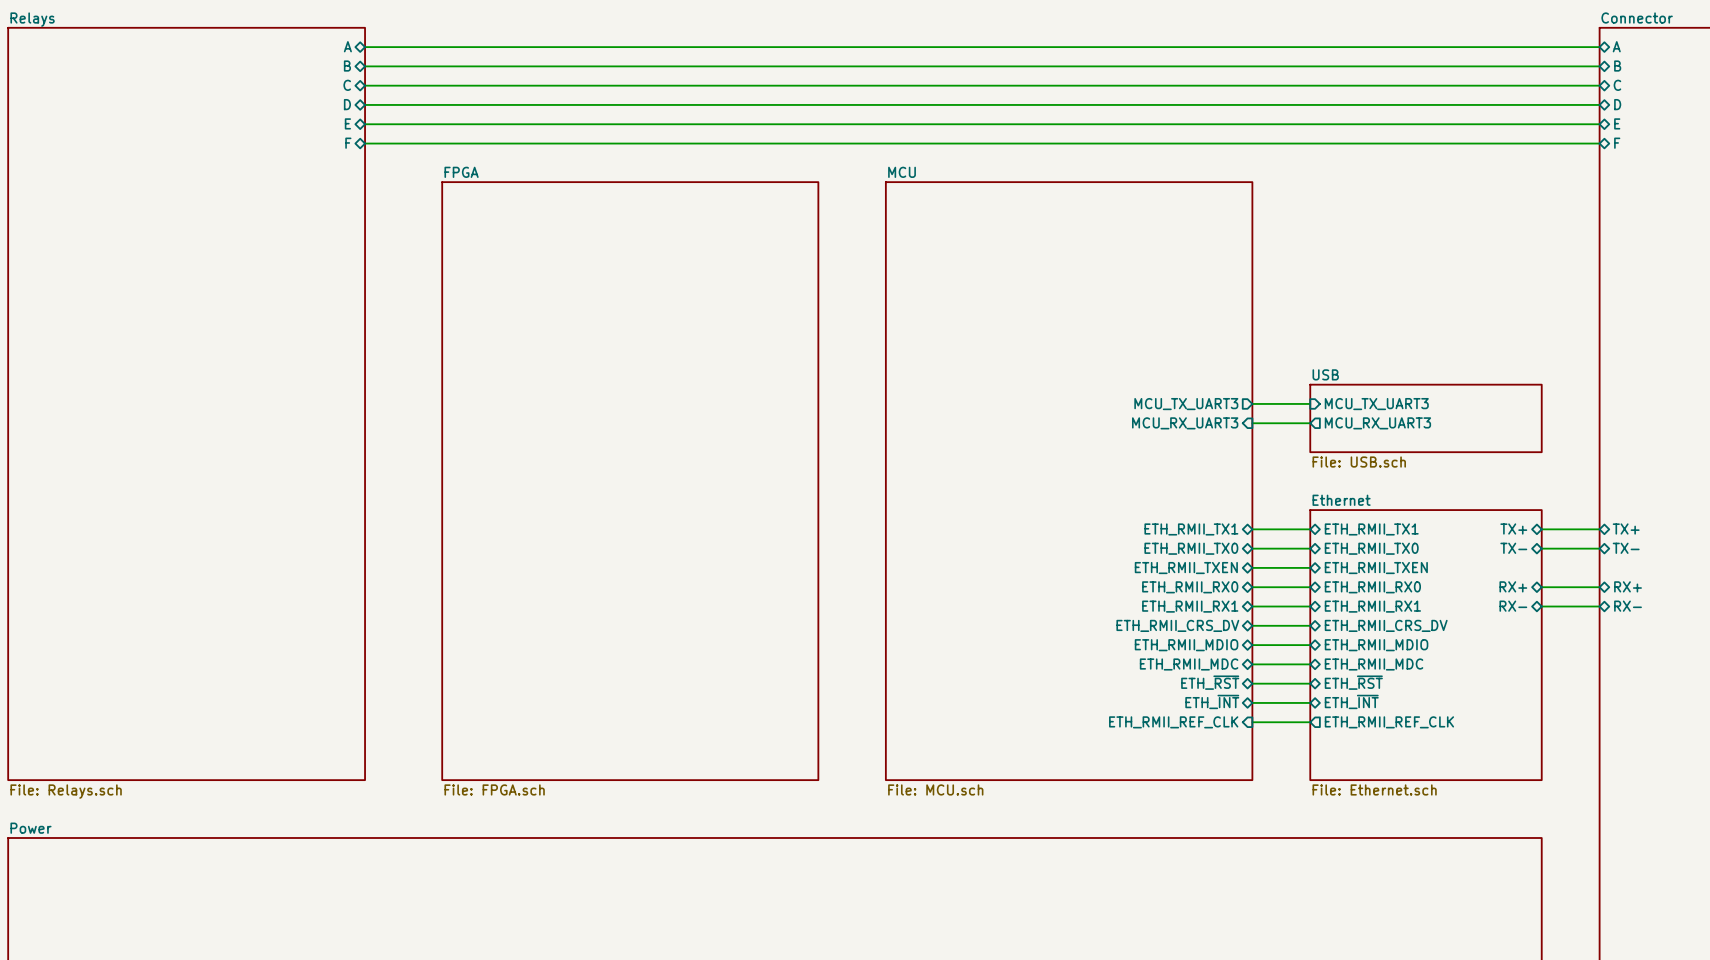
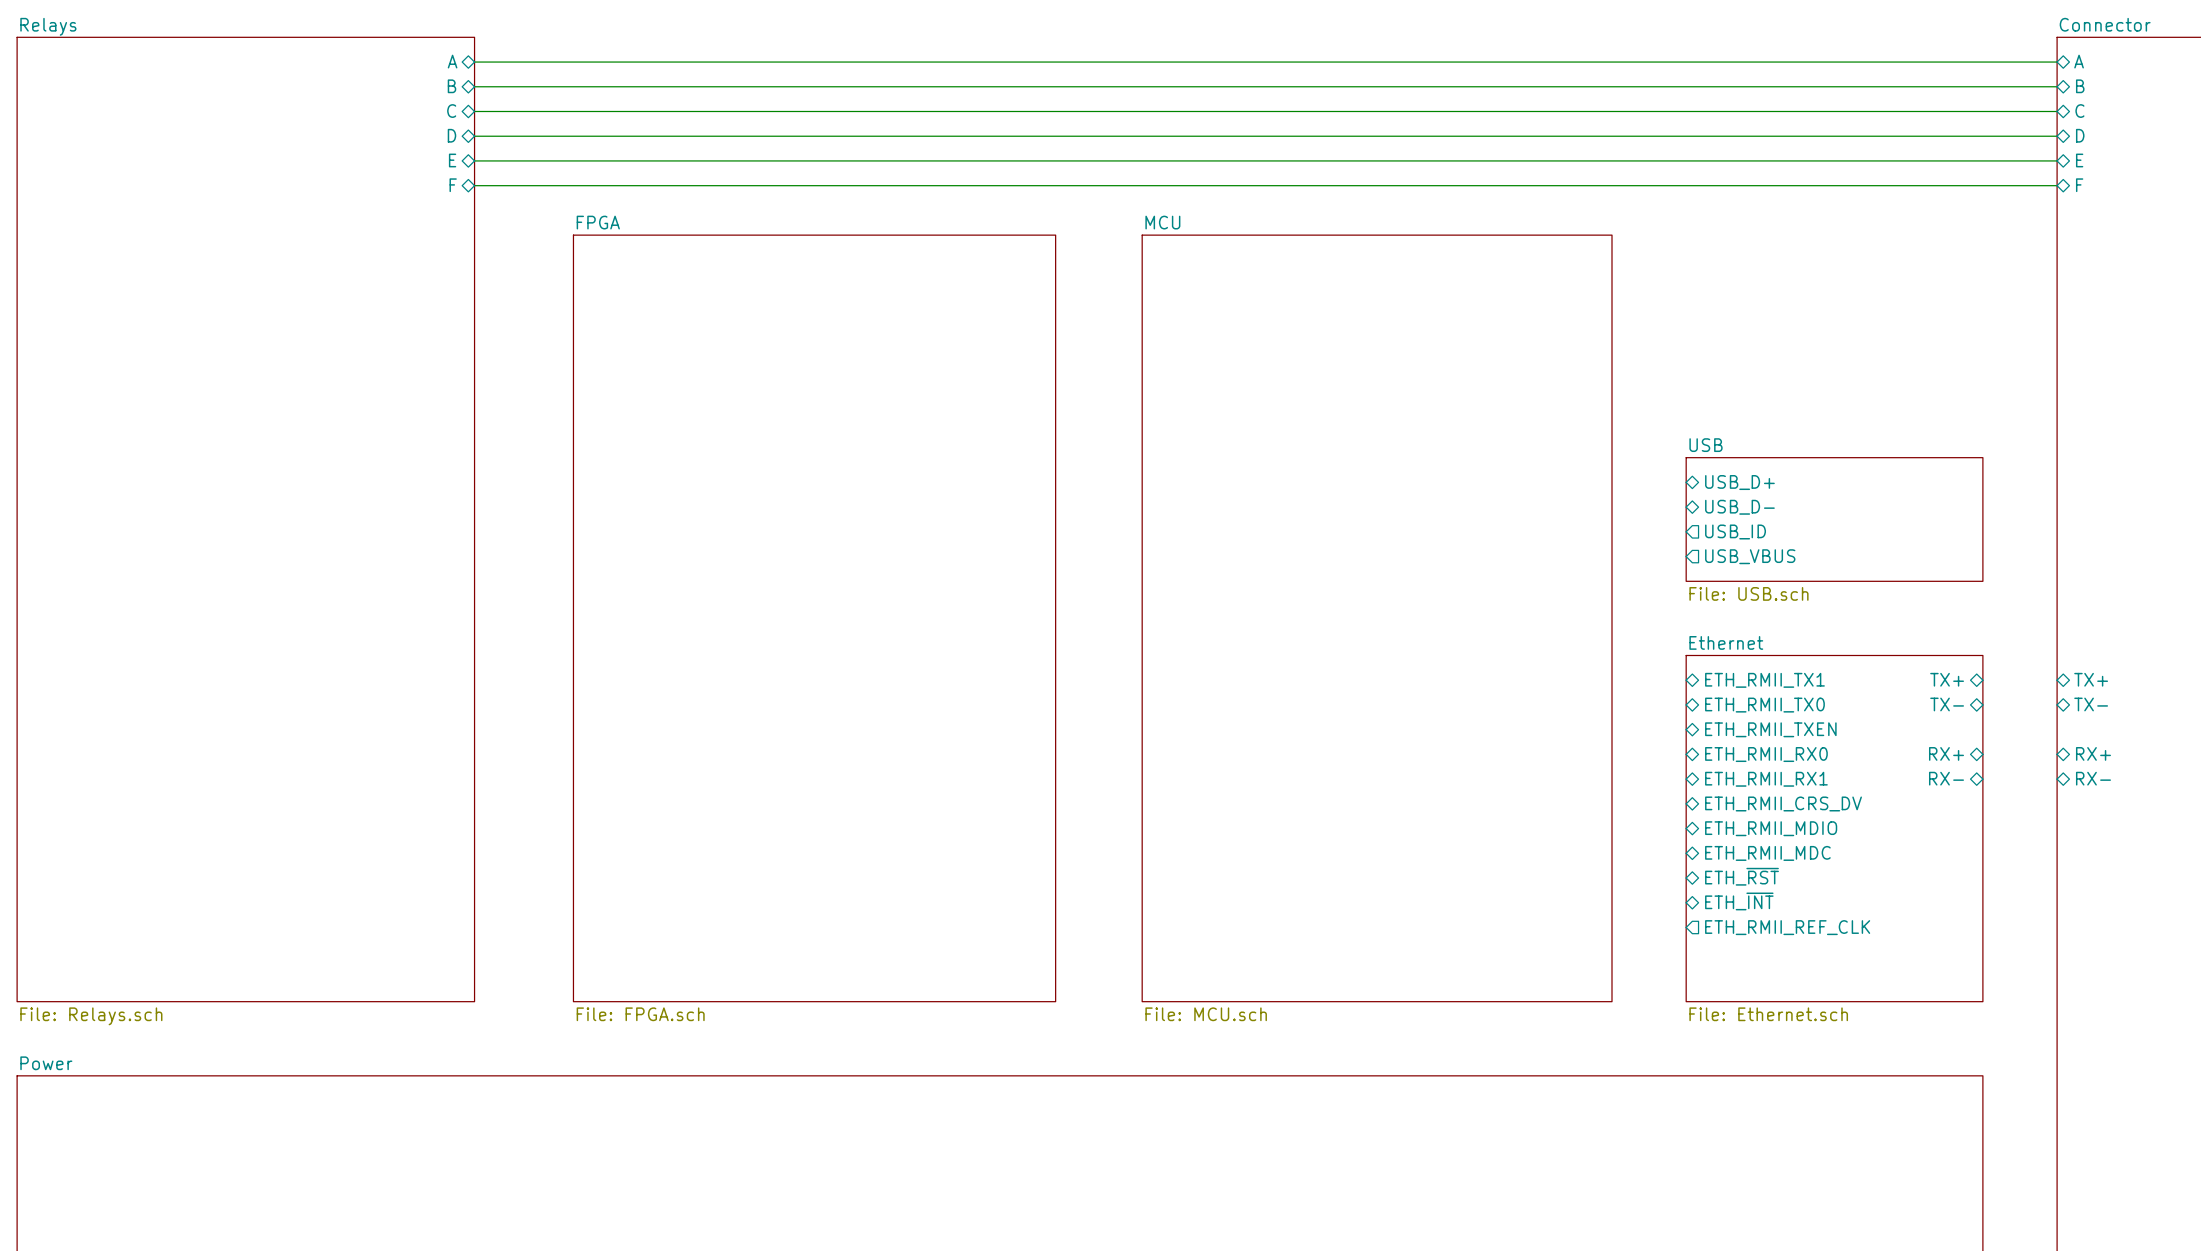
sheet pin: none -> USB_D+ (1739, 482)
sheet pin: none -> USB_D- (1739, 507)
wire: (1252, 403) (1310, 403) -> none
sheet USB: none -> File: USB.sch (1834, 519)
sheet pin: MCU_TX_UART3 (1186, 404) -> none
sheet pin: MCU_TX_UART3 (1376, 404) -> none
sheet pin: none -> USB_ID (1735, 531)
sheet USB: File: USB.sch (1425, 418) -> none
sheet pin: MCU_RX_UART3 (1185, 423) -> none
wire: (1252, 423) (1310, 423) -> none
sheet pin: MCU_RX_UART3 (1377, 423) -> none
sheet pin: none -> USB_VBUS (1750, 556)
sheet pin: ETH_RMII_TX1 (1191, 529) -> none
wire: (1252, 529) (1310, 529) -> none
wire: (1541, 529) (1599, 529) -> none
sheet pin: ETH_RMII_TX0 (1191, 548) -> none
wire: (1252, 548) (1310, 548) -> none
wire: (1541, 548) (1599, 548) -> none
wire: (1252, 567) (1310, 567) -> none
sheet pin: ETH_RMII_TXEN (1186, 568) -> none
sheet pin: ETH_RMII_RX0 (1190, 587) -> none
wire: (1252, 587) (1310, 587) -> none
wire: (1541, 587) (1599, 587) -> none
sheet pin: ETH_RMII_RX1 (1190, 606) -> none
wire: (1252, 606) (1310, 606) -> none
wire: (1541, 606) (1599, 606) -> none
sheet pin: ETH_RMII_CRS_DV (1177, 625) -> none
wire: (1252, 625) (1310, 625) -> none
sheet pin: ETH_RMII_MDIO (1186, 645) -> none
wire: (1252, 645) (1310, 645) -> none
sheet pin: ETH_RMII_MDC (1189, 664) -> none
wire: (1252, 664) (1310, 664) -> none
sheet pin: ETH_~{RST} (1210, 682) -> none
wire: (1252, 683) (1310, 683) -> none
sheet pin: ETH_~{INT} (1212, 701) -> none
wire: (1252, 702) (1310, 702) -> none
sheet pin: ETH_RMII_REF_CLK (1173, 722) -> none
wire: (1252, 722) (1310, 722) -> none

